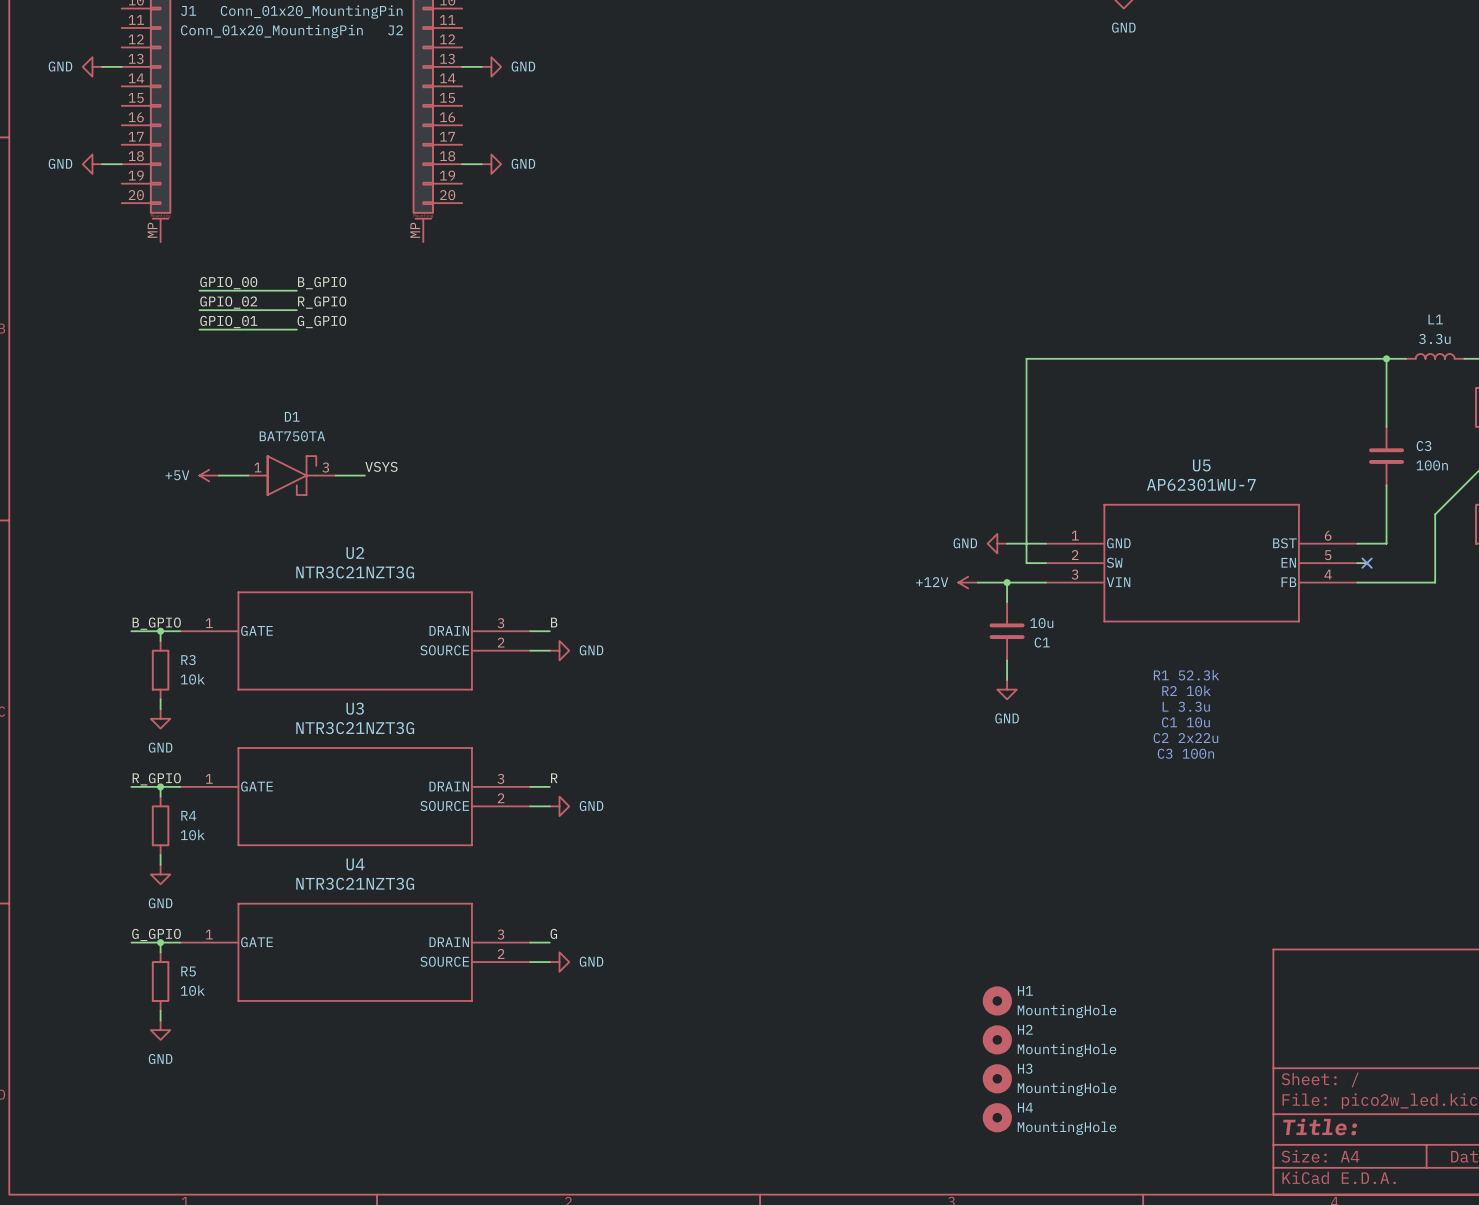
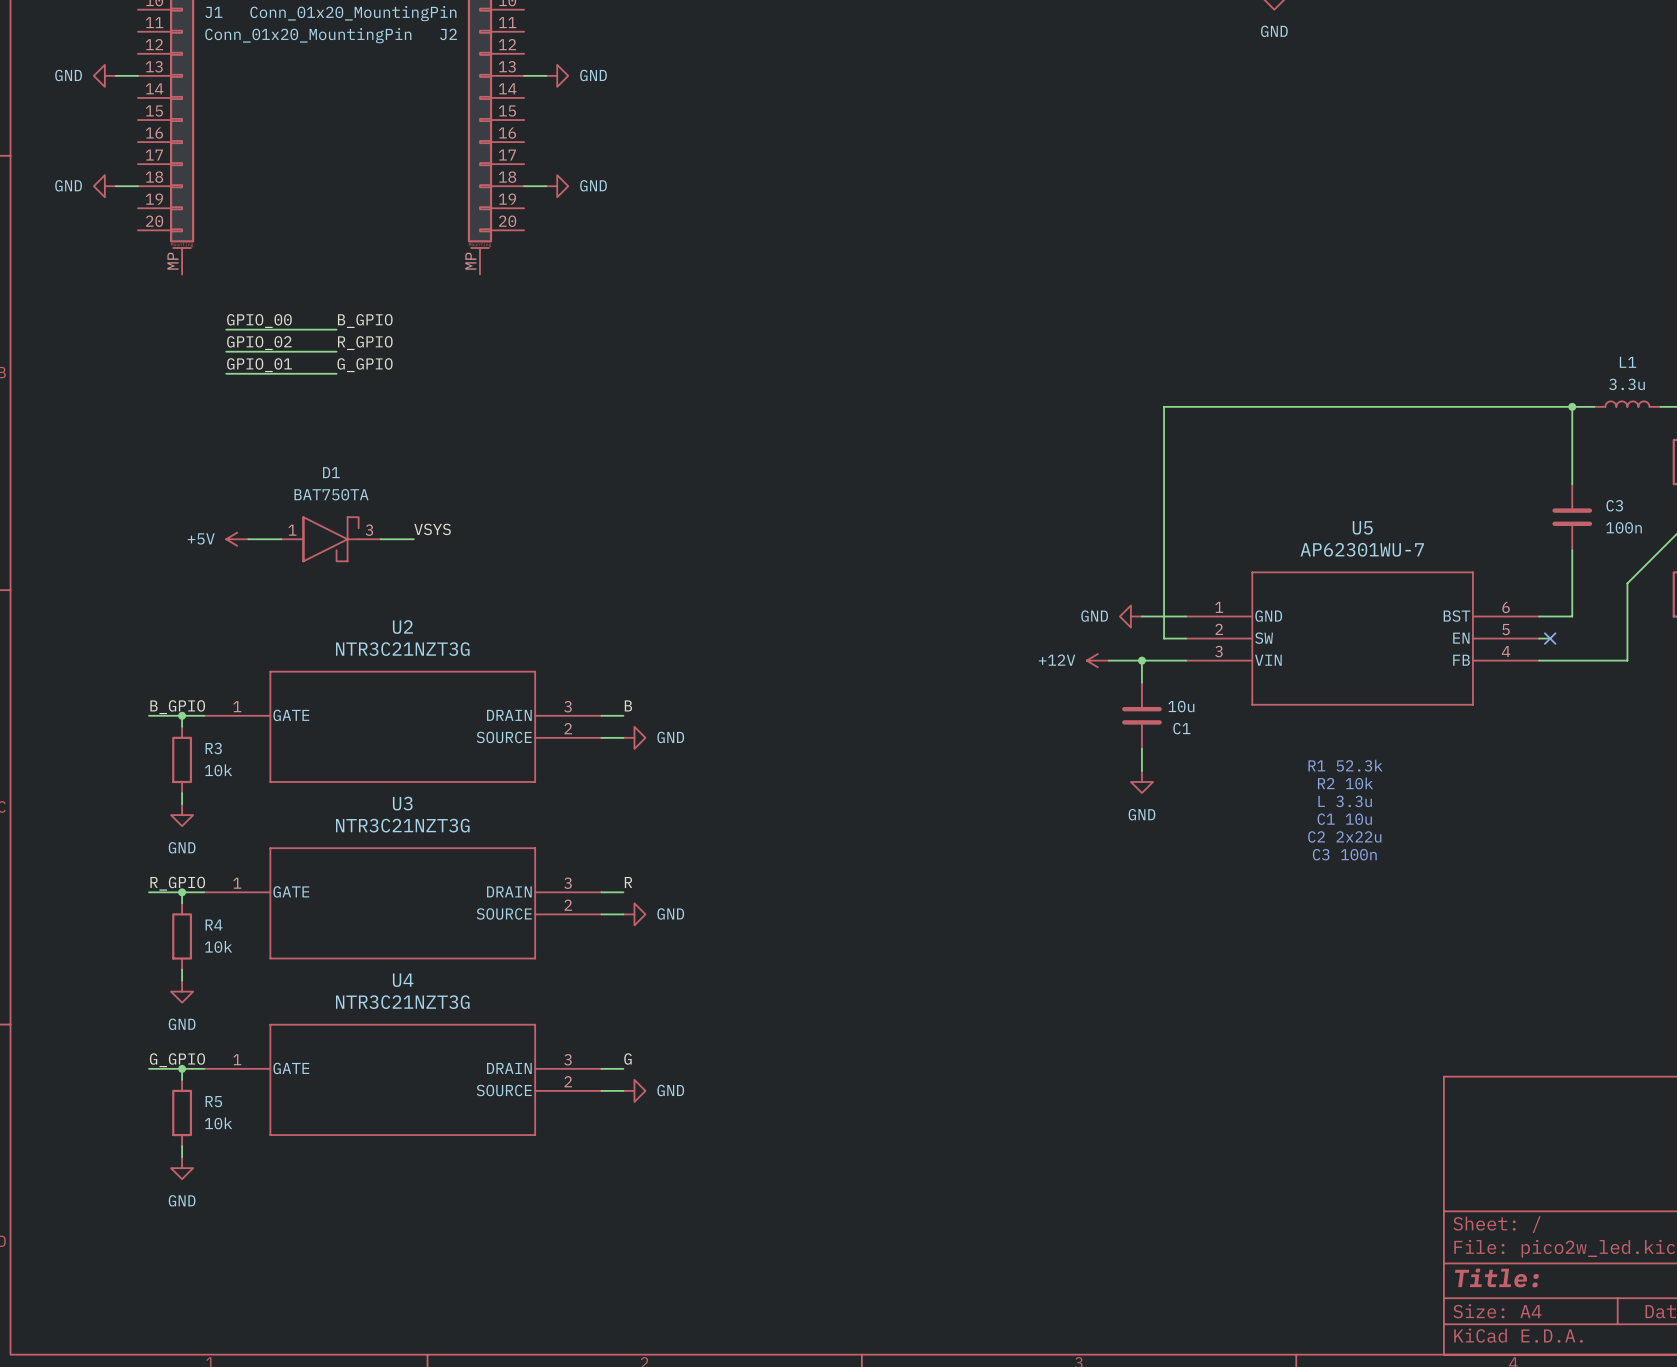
H1: MountingHole (997, 1000) -> none
H2: MountingHole (997, 1039) -> none
H3: MountingHole (997, 1078) -> none
H4: MountingHole (997, 1117) -> none

